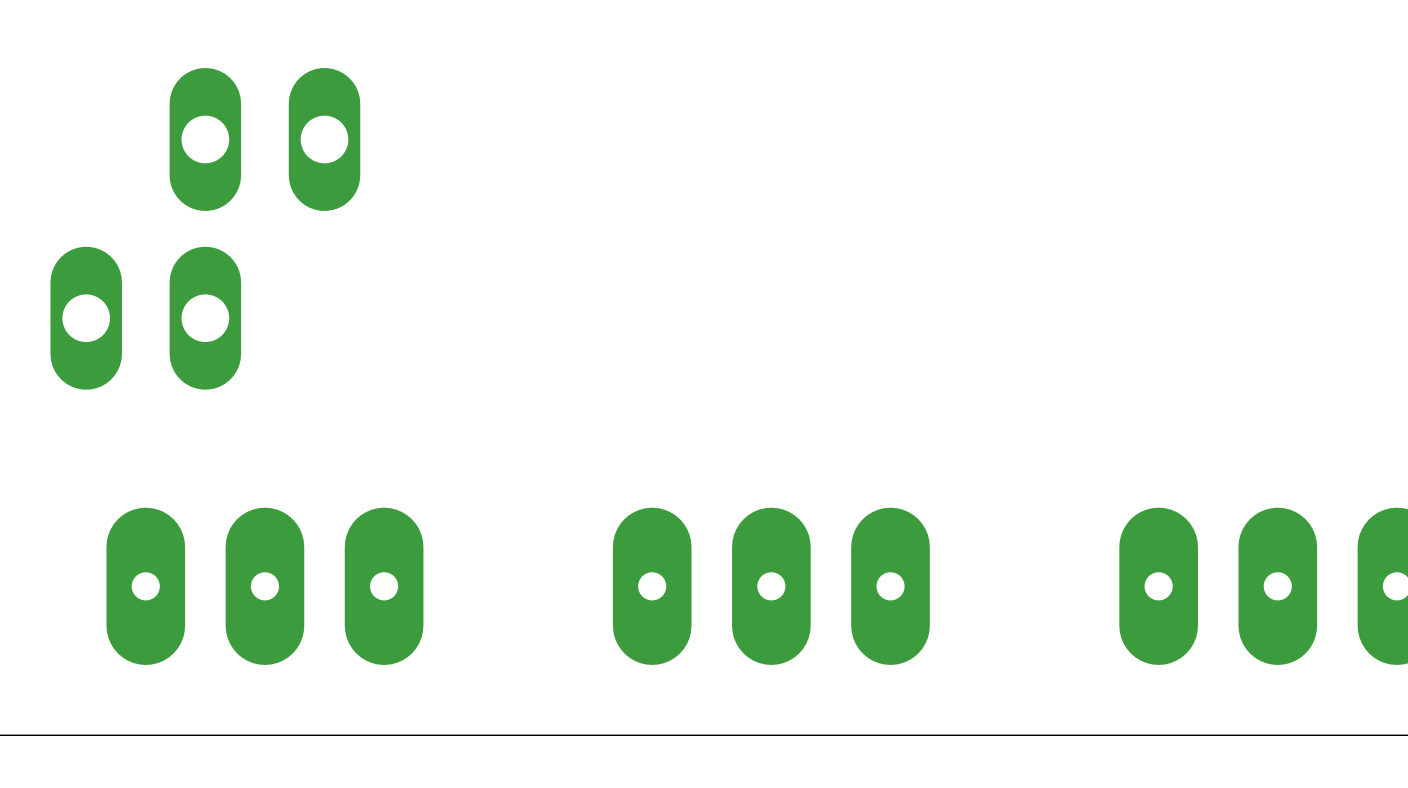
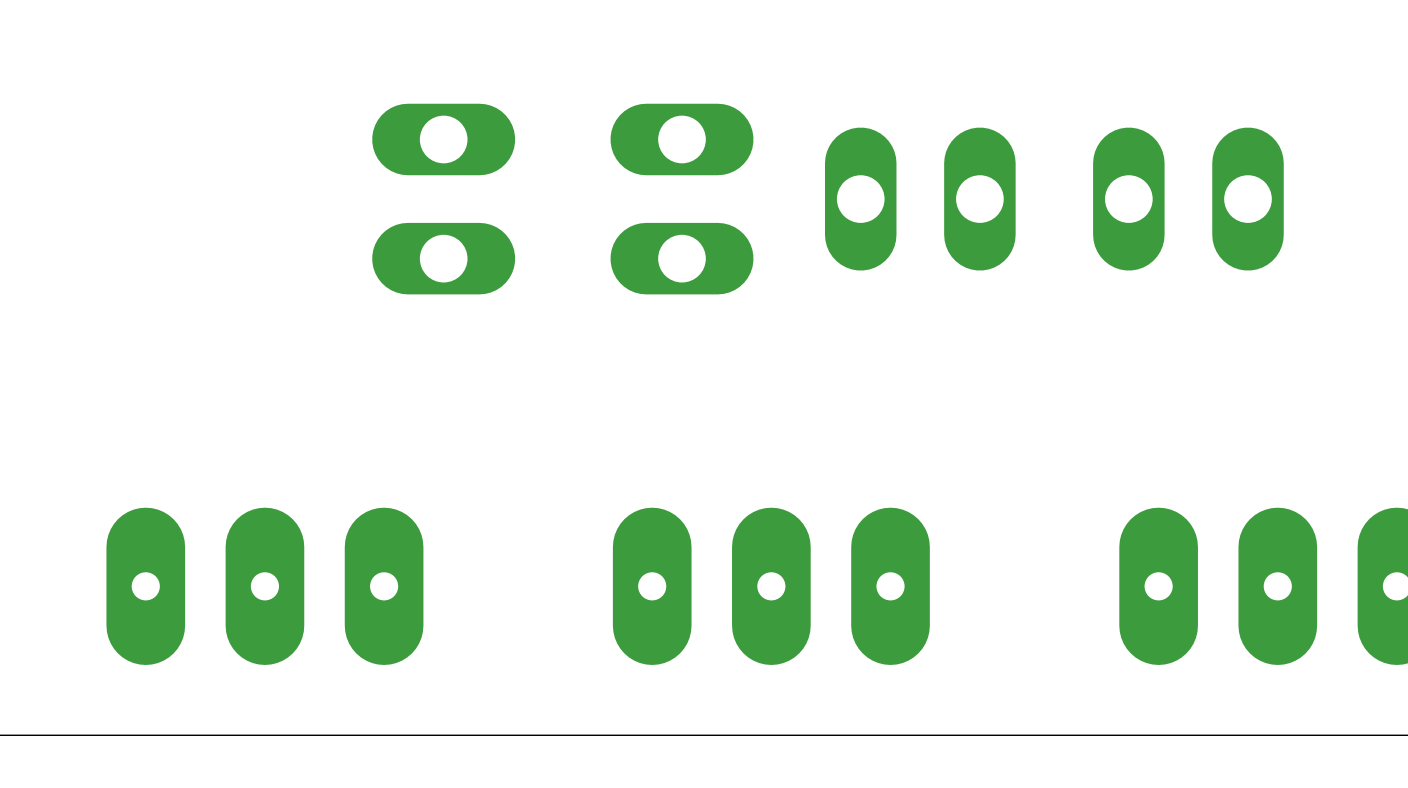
part: (264, 139) -> none
part: none -> (443, 199)
part: none -> (681, 199)
part: none -> (920, 199)
part: none -> (1188, 199)
part: (145, 318) -> none

